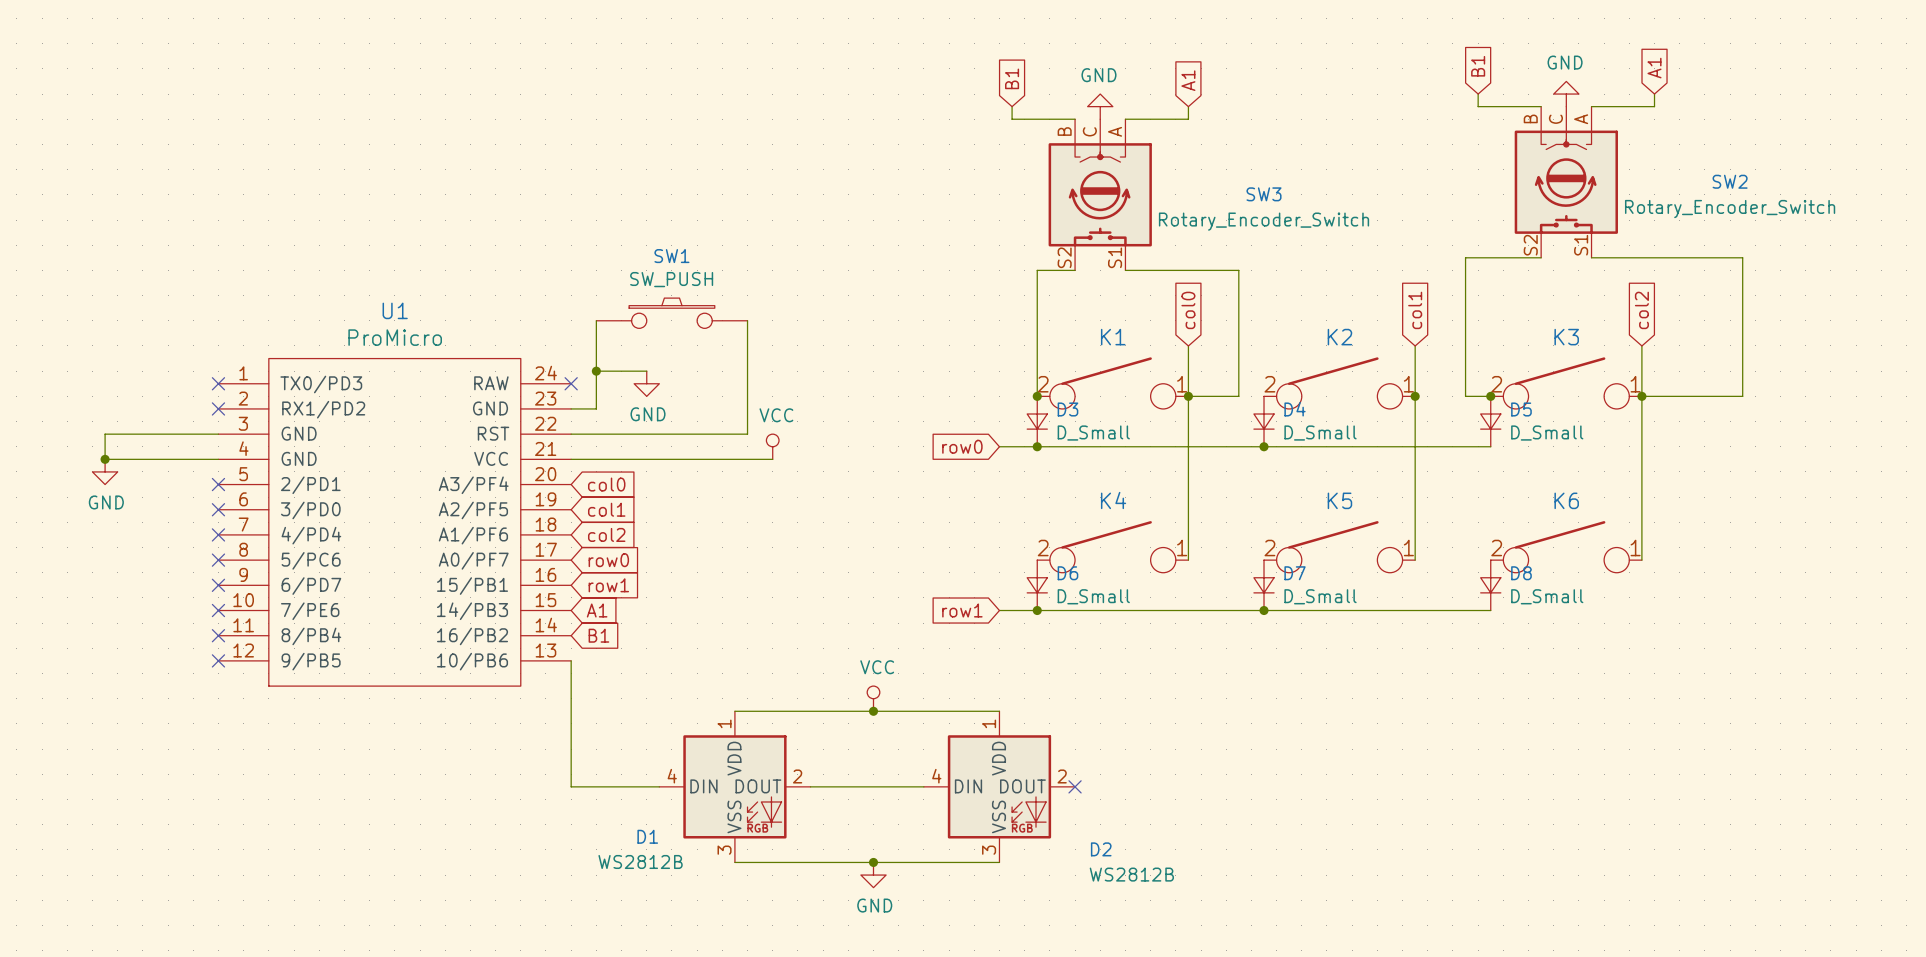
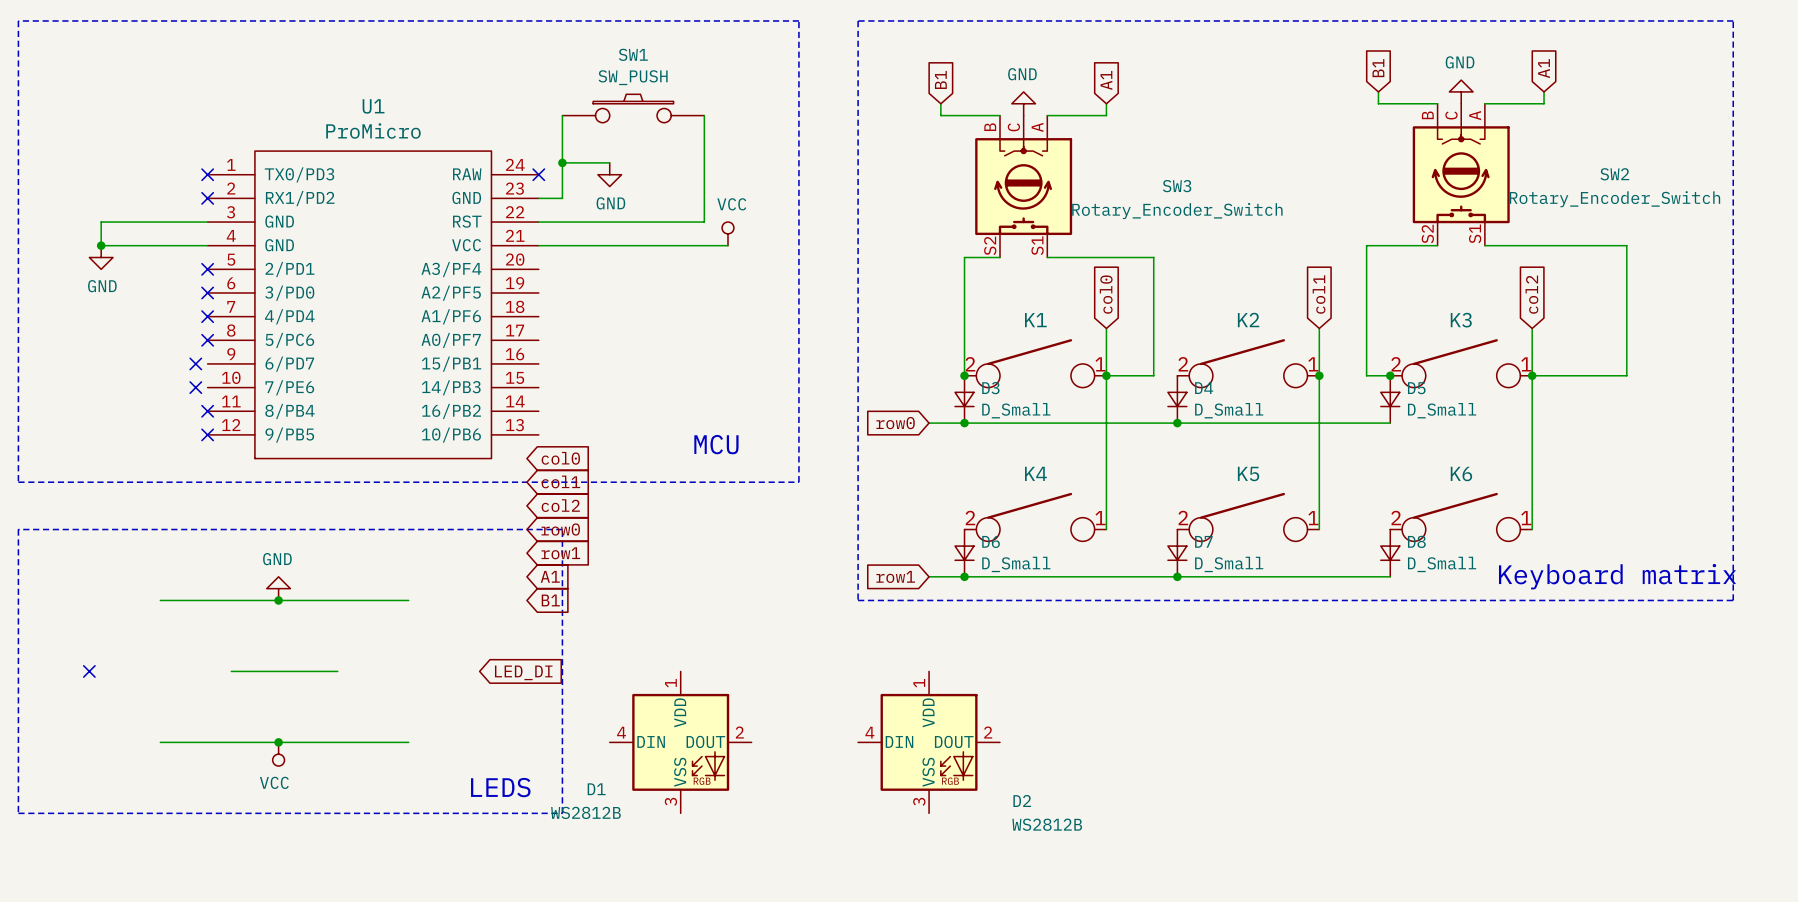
line: none -> (18, 20) (798, 20) (798, 482) (18, 482) (18, 20)
line: none -> (858, 20) (1733, 20) (1733, 600) (858, 600) (858, 20)
junction: none -> (562, 162)
no-connect mark: none -> (207, 174)
no-connect mark: none -> (538, 174)
no-connect mark: none -> (207, 198)
junction: none -> (101, 245)
power symbol: none -> GND (101, 257)
no-connect mark: none -> (207, 269)
no-connect mark: none -> (207, 292)
SW1 position: (671, 313) -> (633, 108)
wire: (596, 320) (596, 408) (571, 408) -> (562, 115) (562, 198) (538, 198)
wire: (747, 320) (747, 434) (571, 434) -> (704, 115) (704, 222) (538, 222)
no-connect mark: none -> (207, 316)
no-connect mark: none -> (207, 340)
wire: (596, 371) (646, 371) -> (562, 162) (609, 162)
junction: (596, 371) -> none
no-connect mark: (571, 383) -> none
power symbol position: GND (646, 383) -> GND (609, 174)
wire: (218, 434) (105, 434) (105, 459) (218, 459) -> (207, 222) (101, 222) (101, 245) (207, 245)
no-connect mark: none -> (207, 411)
power symbol position: VCC (772, 446) -> VCC (727, 233)
junction: (105, 459) -> none
no-connect mark: none -> (207, 434)
wire: (571, 459) (772, 459) -> (538, 245) (727, 245)
text: none -> MCU (716, 444)
power symbol: GND (105, 471) -> none
no-connect mark: (218, 484) -> none
no-connect mark: (218, 509) -> none
U1 position: (394, 522) -> (373, 304)
no-connect mark: (218, 534) -> none
line: none -> (18, 529) (562, 529) (562, 813) (18, 813) (18, 529)
no-connect mark: (218, 560) -> none
no-connect mark: (218, 585) -> none
no-connect mark: (218, 610) -> none
text: none -> Keyboard matrix (1617, 576)
power symbol: none -> GND (278, 588)
wire: none -> (160, 600) (408, 600)
no-connect mark: (218, 635) -> none
junction: none -> (278, 600)
no-connect mark: (218, 660) -> none
wire: (571, 660) (571, 786) (659, 786) -> none
power symbol: VCC (873, 698) -> none
no-connect mark: none -> (89, 671)
wire: none -> (231, 671) (337, 671)
global label: none -> LED_DI (523, 672)
wire: (734, 711) (999, 711) -> none
junction: (873, 711) -> none
wire: none -> (160, 742) (408, 742)
junction: none -> (278, 742)
wire: (810, 786) (923, 786) -> none
no-connect mark: (1075, 786) -> none
power symbol: none -> VCC (278, 754)
text: none -> LEDS (500, 787)
wire: (734, 862) (999, 862) -> none
junction: (873, 862) -> none
power symbol: GND (873, 875) -> none

